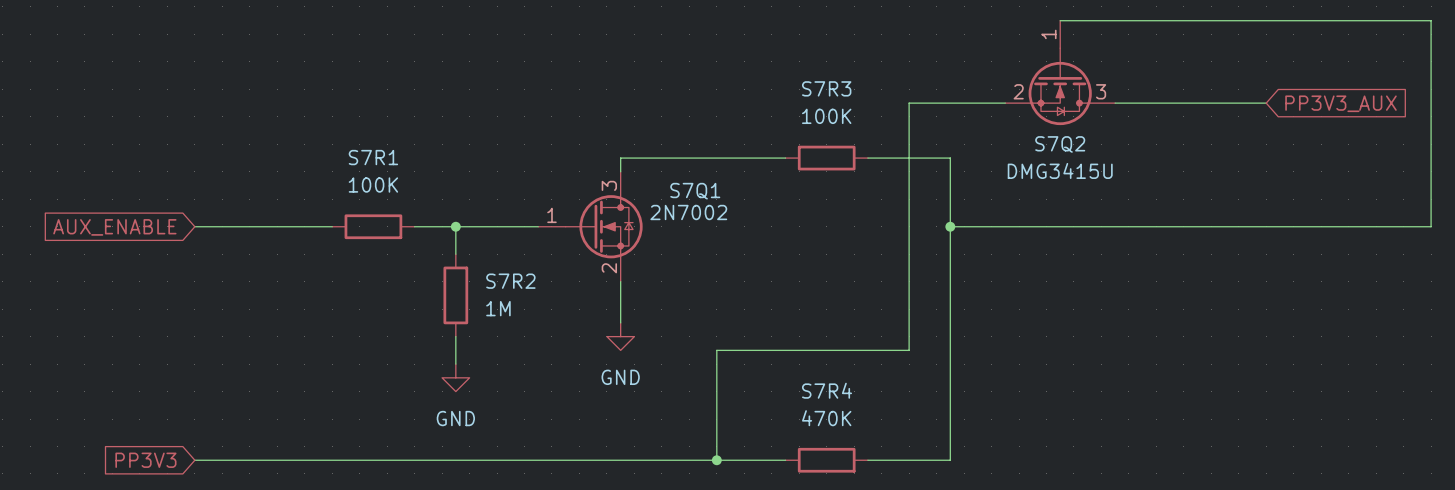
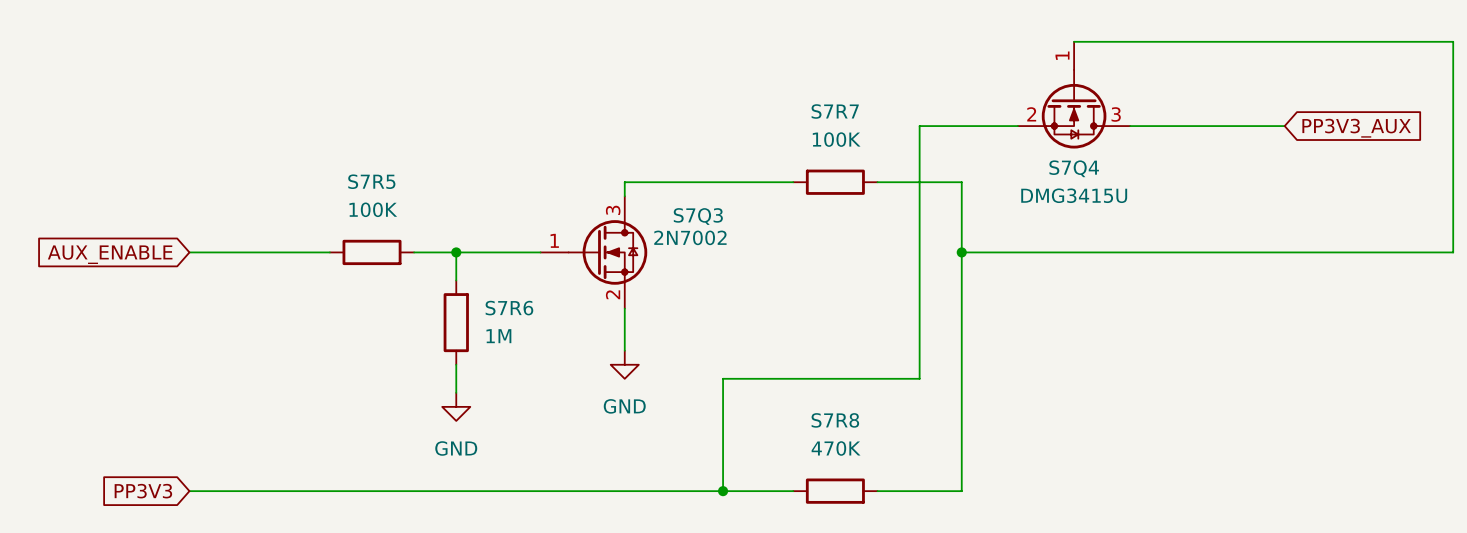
S7R3 name: S7R3 (826, 88) -> S7R7 (835, 111)
S7Q2 name: S7Q2 (1060, 144) -> S7Q4 (1074, 168)
S7R1 name: S7R1 (373, 157) -> S7R5 (371, 181)
S7Q1 name: S7Q1 (695, 191) -> S7Q3 (698, 216)
S7R2 name: S7R2 (510, 281) -> S7R6 (509, 308)
S7R4 name: S7R4 (827, 390) -> S7R8 (835, 420)

